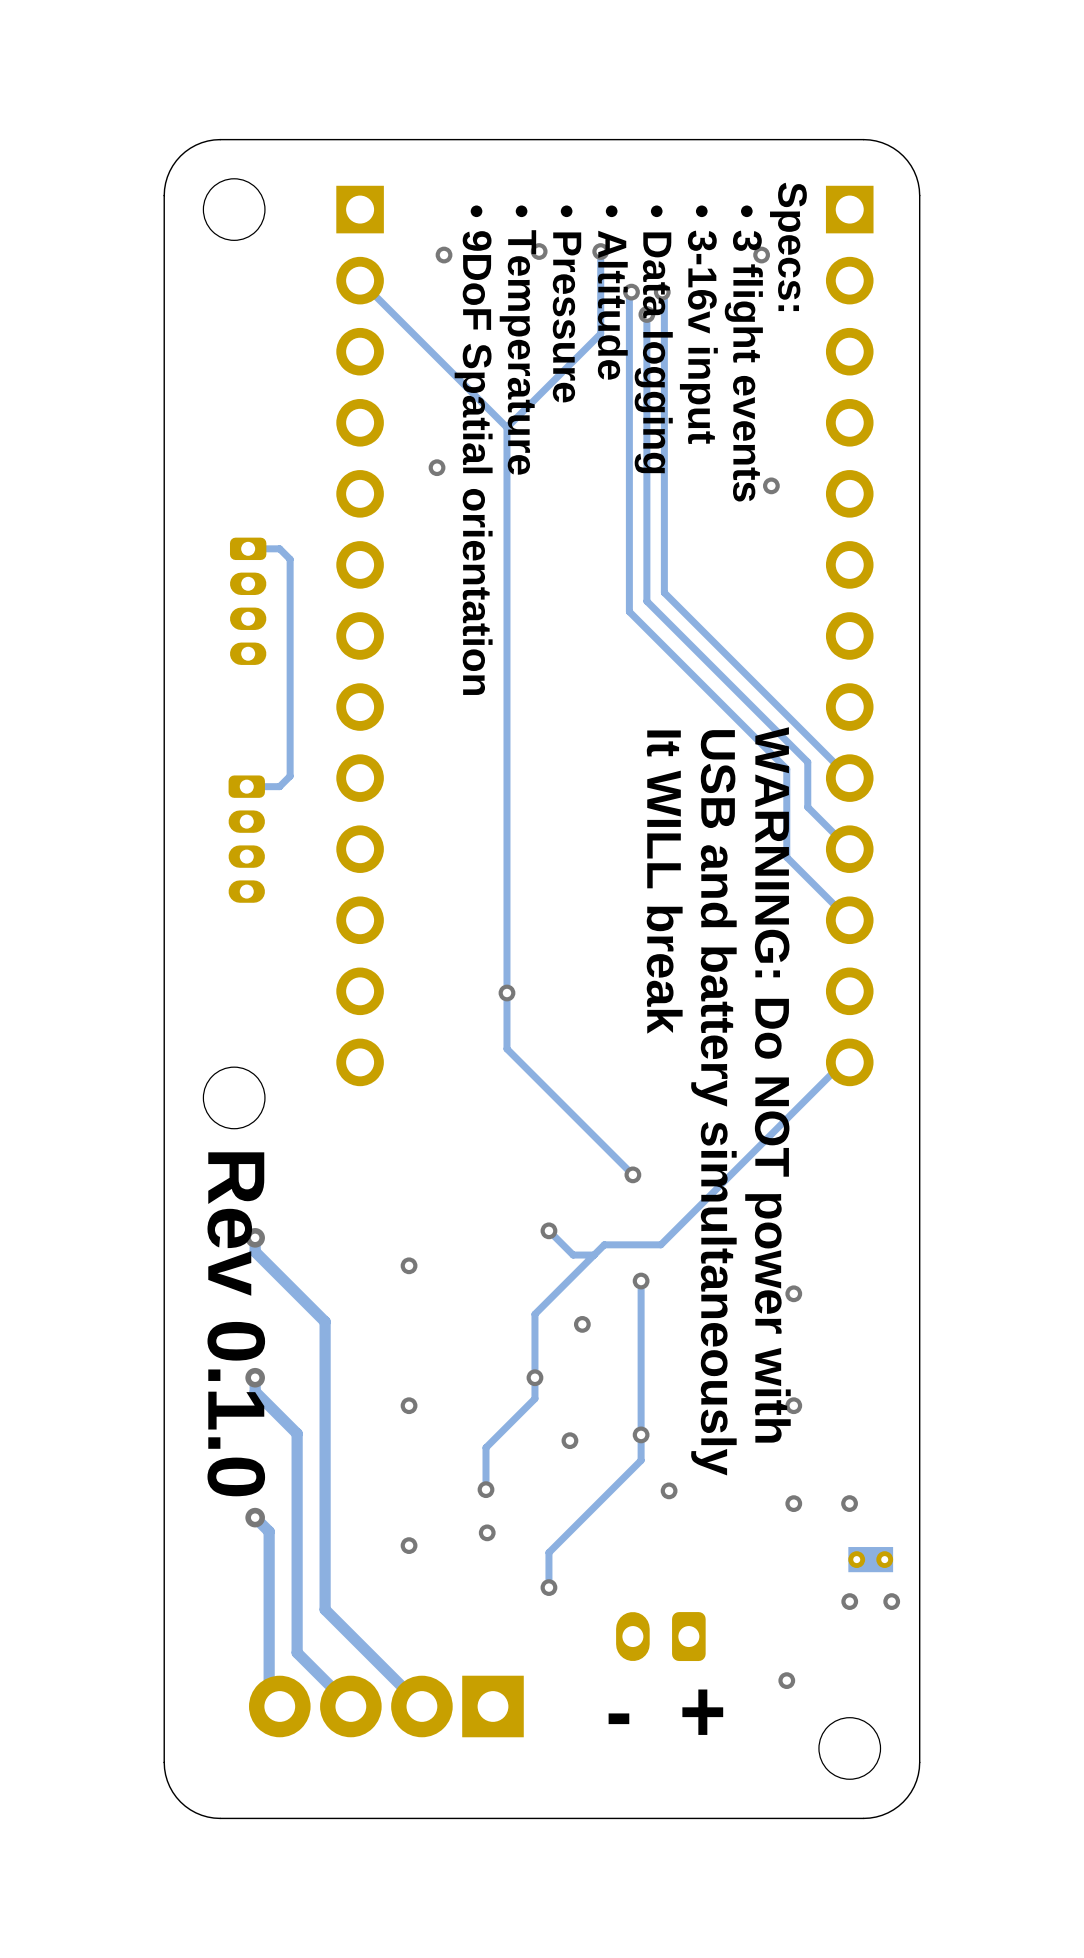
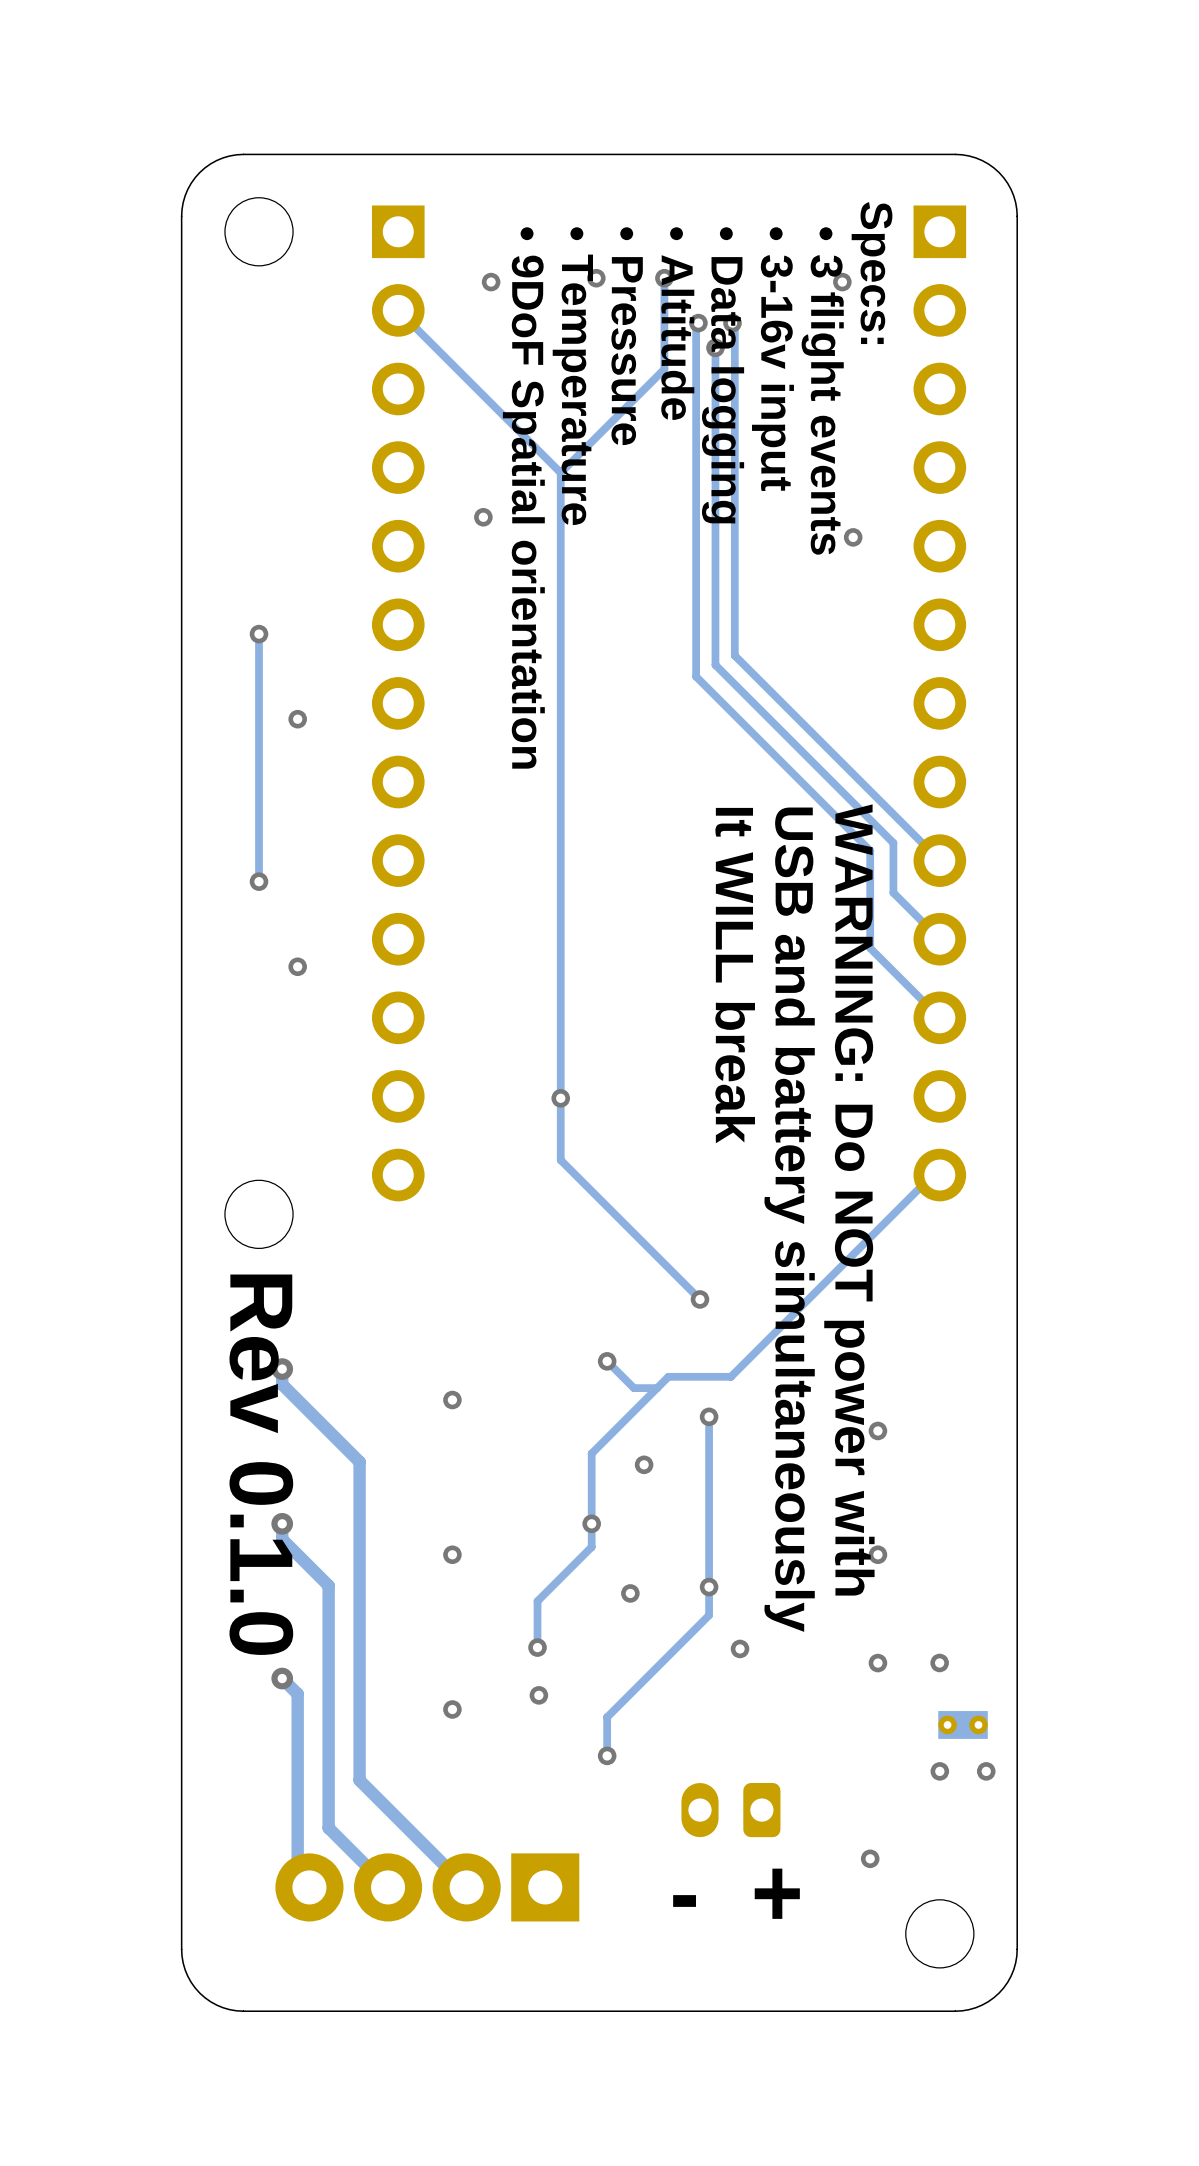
track: (248, 548) (279, 548) (290, 559) (290, 776) (279, 786) (246, 786) -> none
track: none -> (259, 634) (259, 881)
via: none -> (259, 634)
part: (248, 601) -> none
via: none -> (297, 719)
via: none -> (259, 881)
part: (246, 839) -> none
via: none -> (297, 966)

